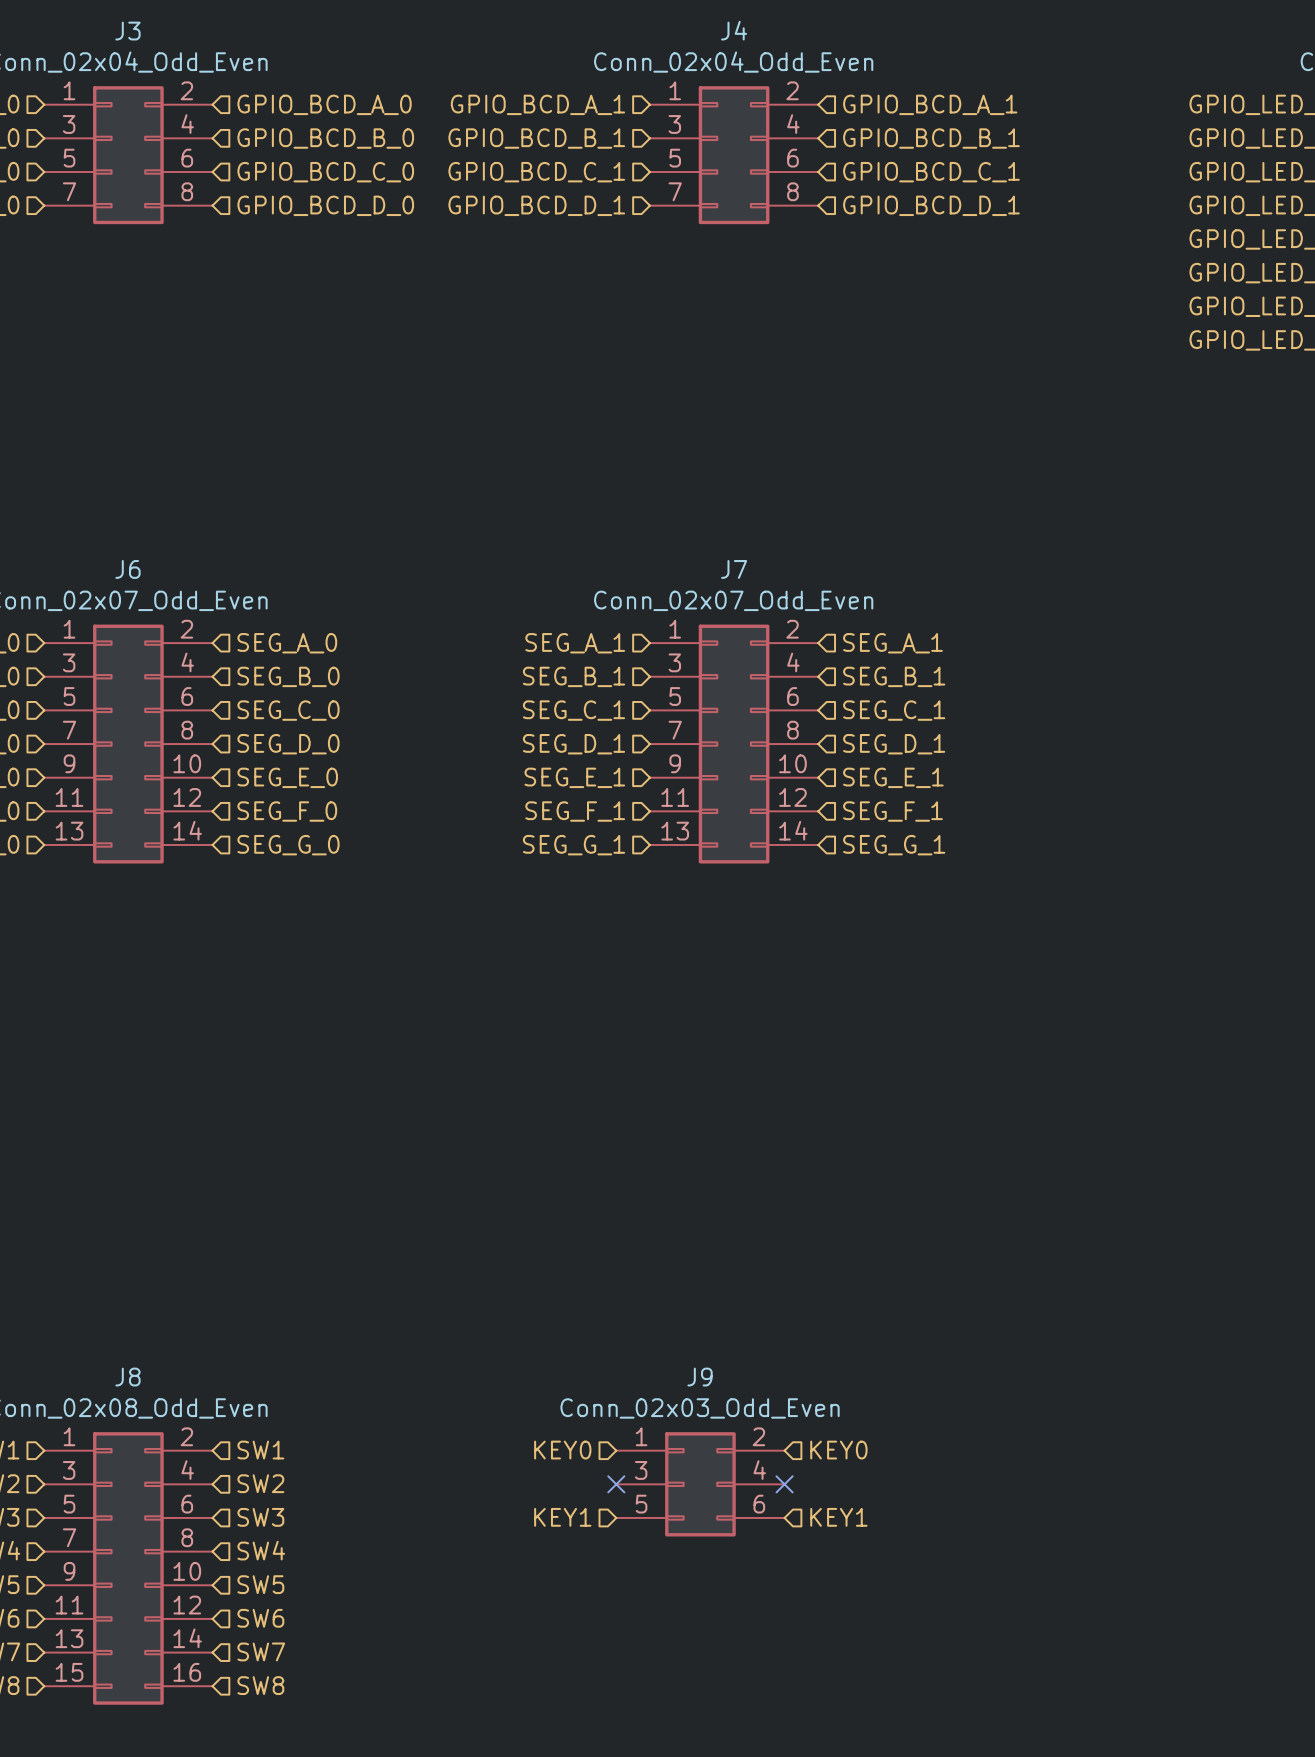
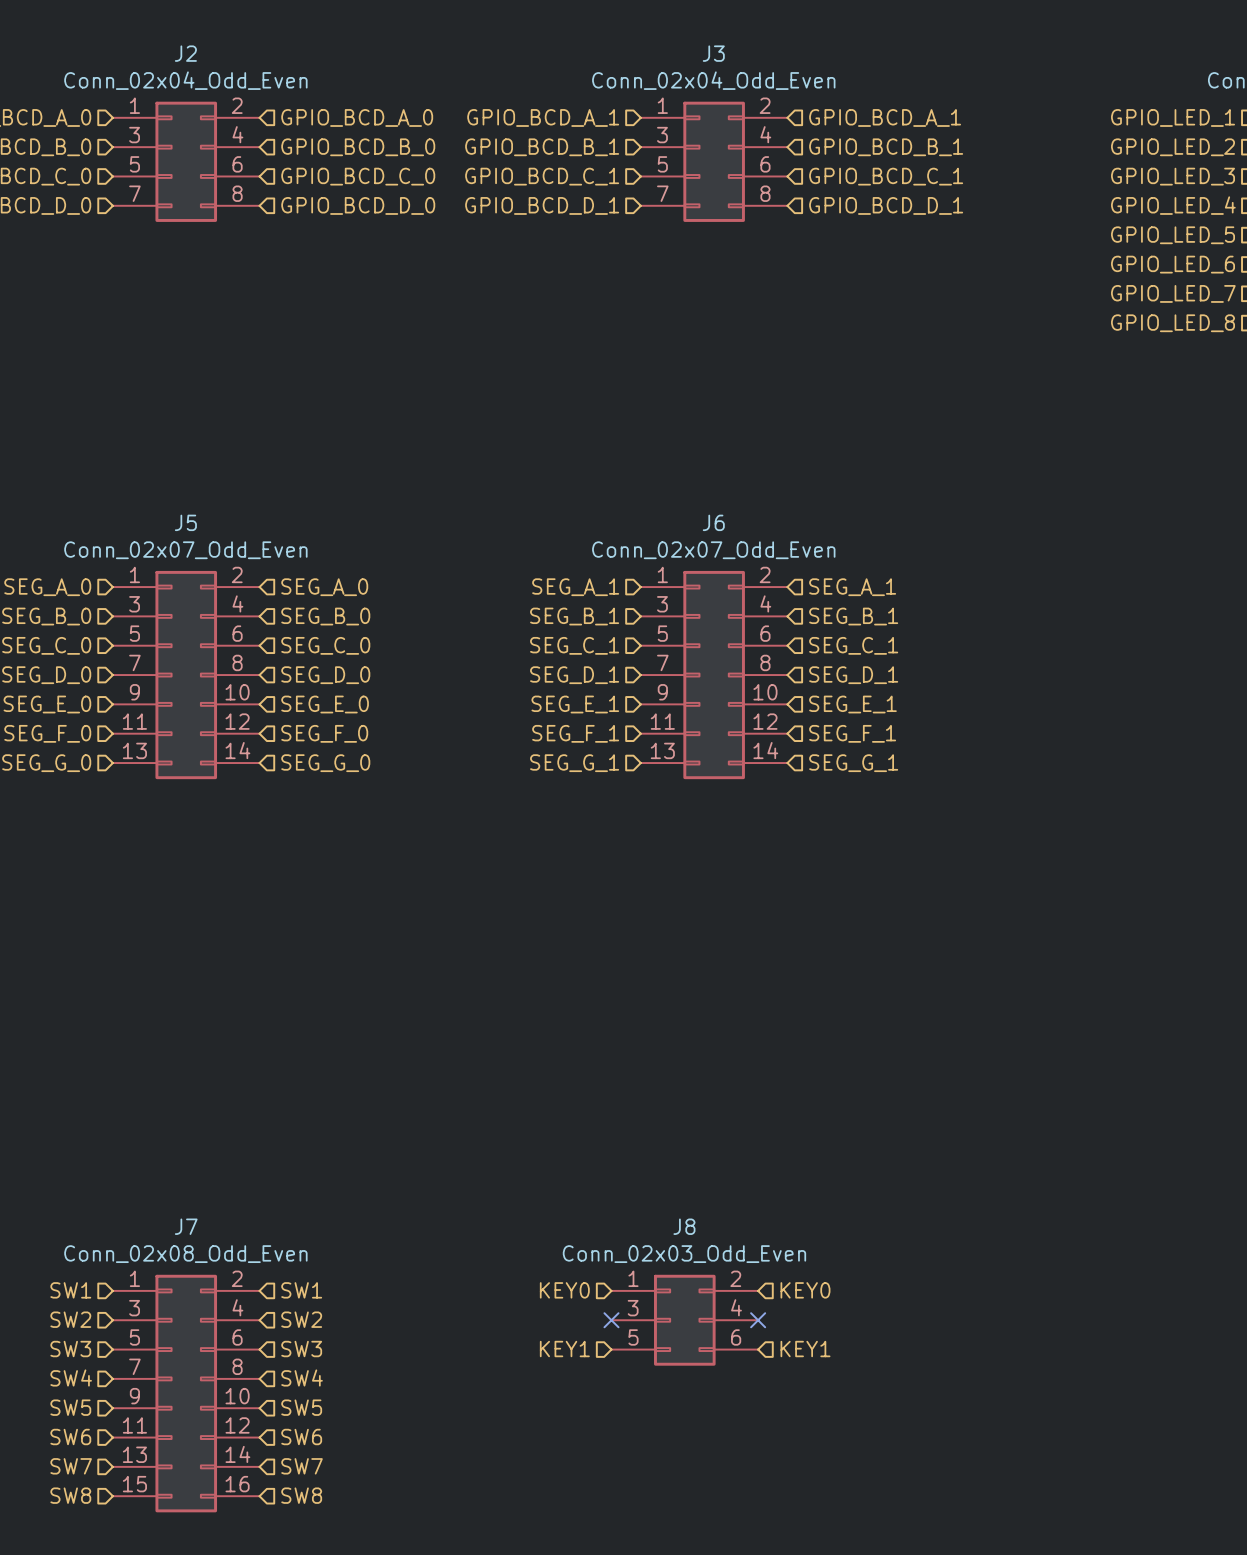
J4 name: J4 (734, 30) -> J3 (713, 53)
J3 name: J3 (127, 31) -> J2 (185, 53)
J6 name: J6 (127, 569) -> J5 (185, 522)
J7 name: J7 (734, 569) -> J6 (713, 522)
J8 name: J8 (127, 1377) -> J7 (186, 1226)
J9 name: J9 (700, 1377) -> J8 (684, 1226)

